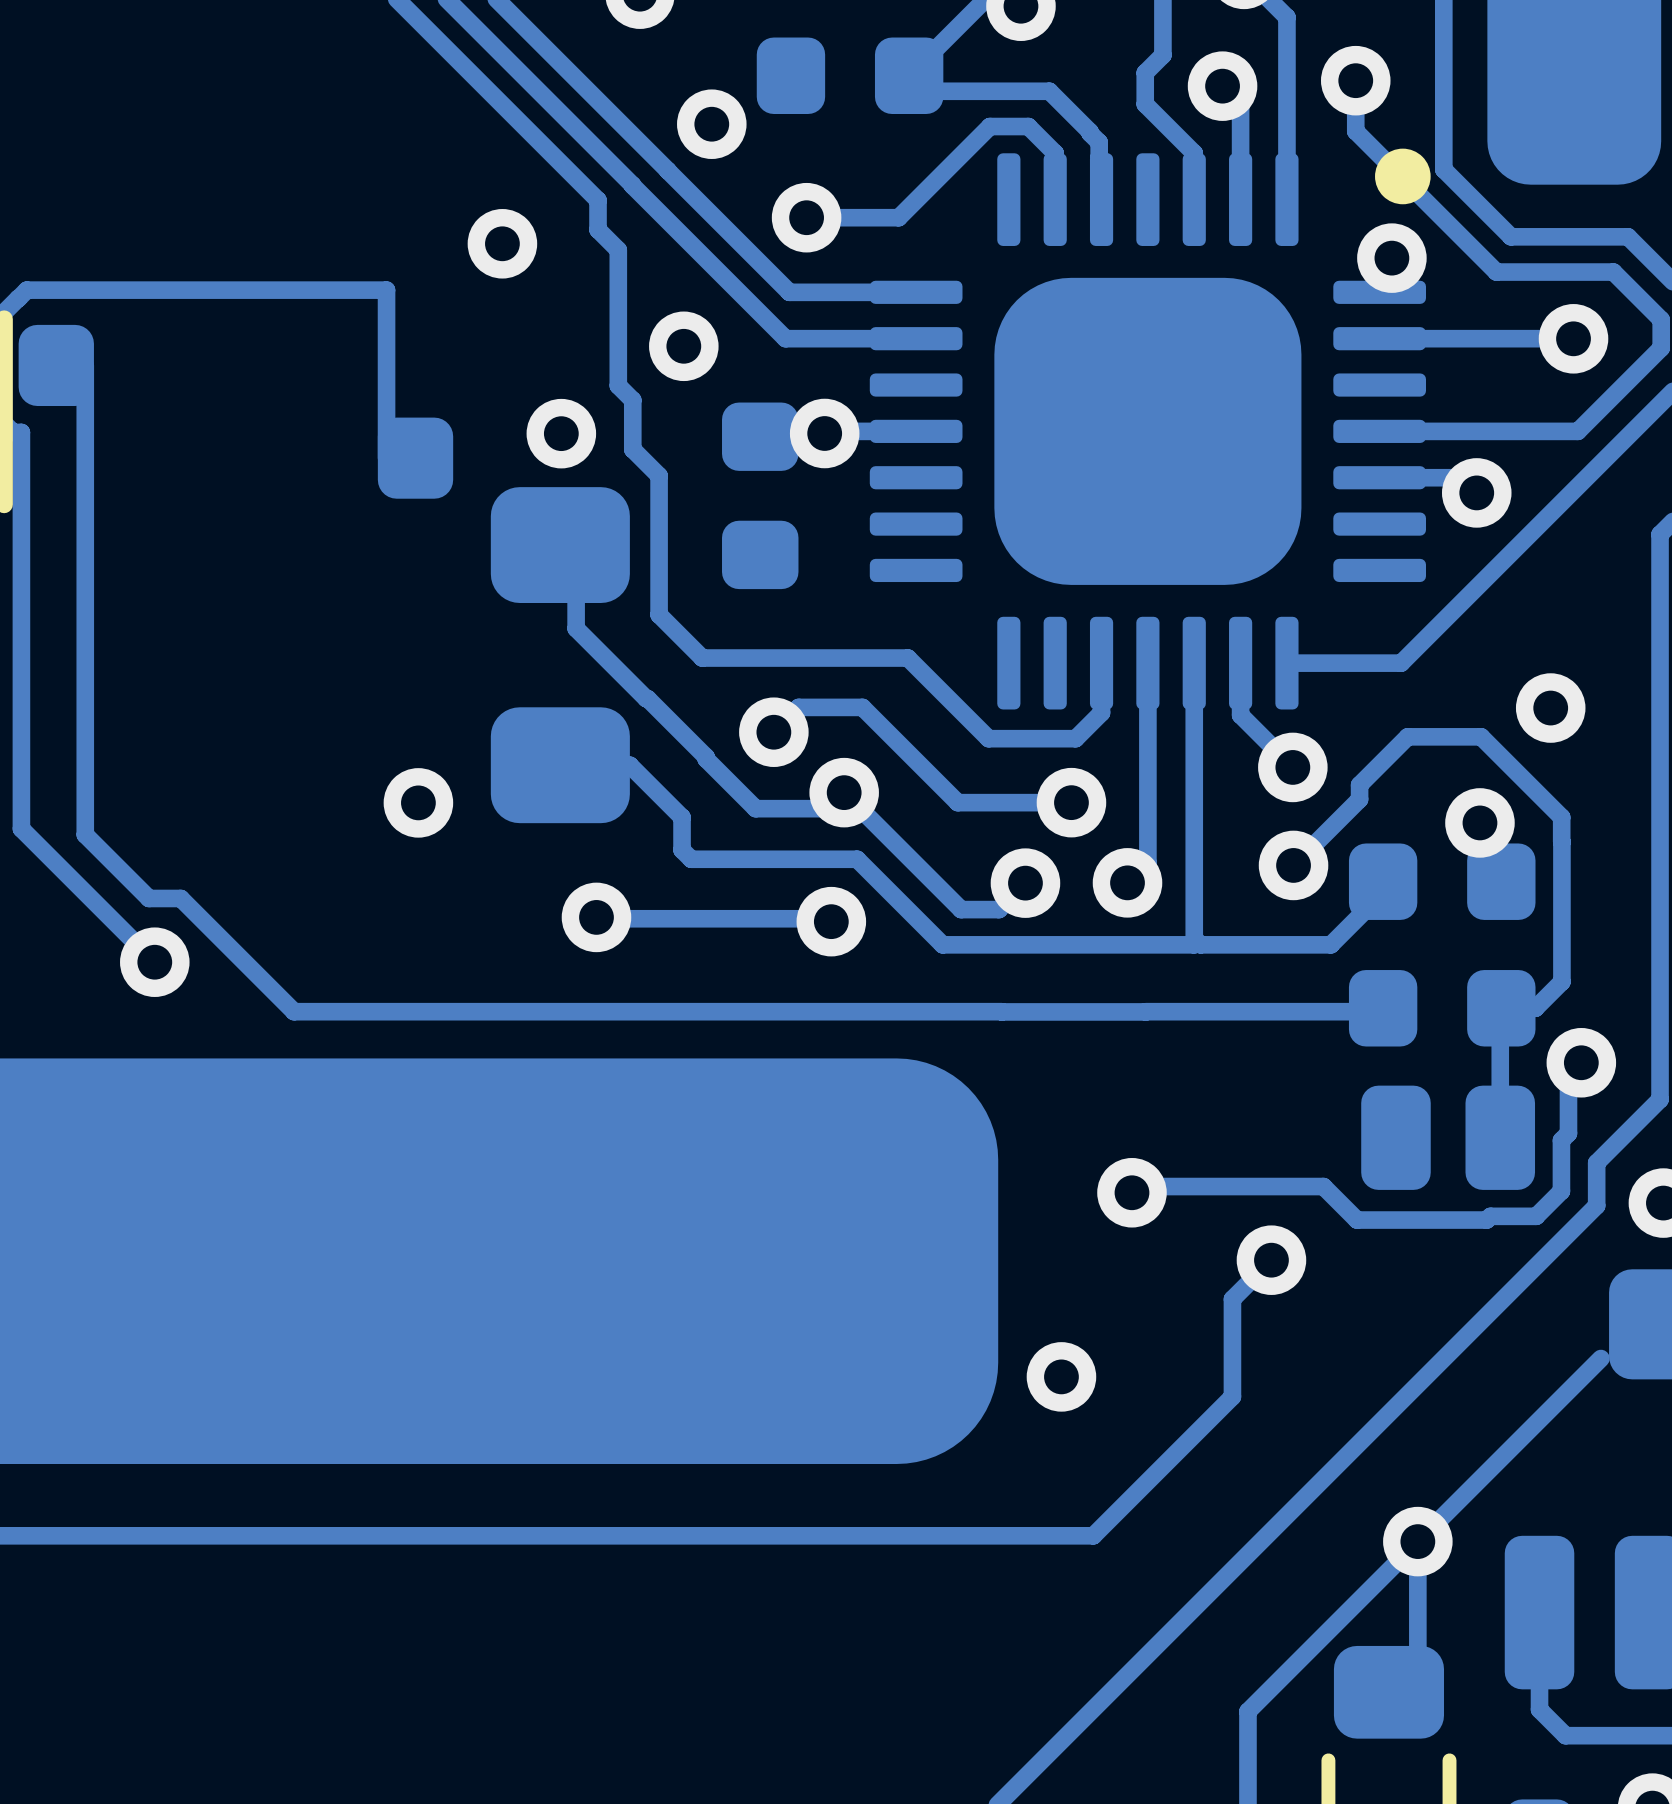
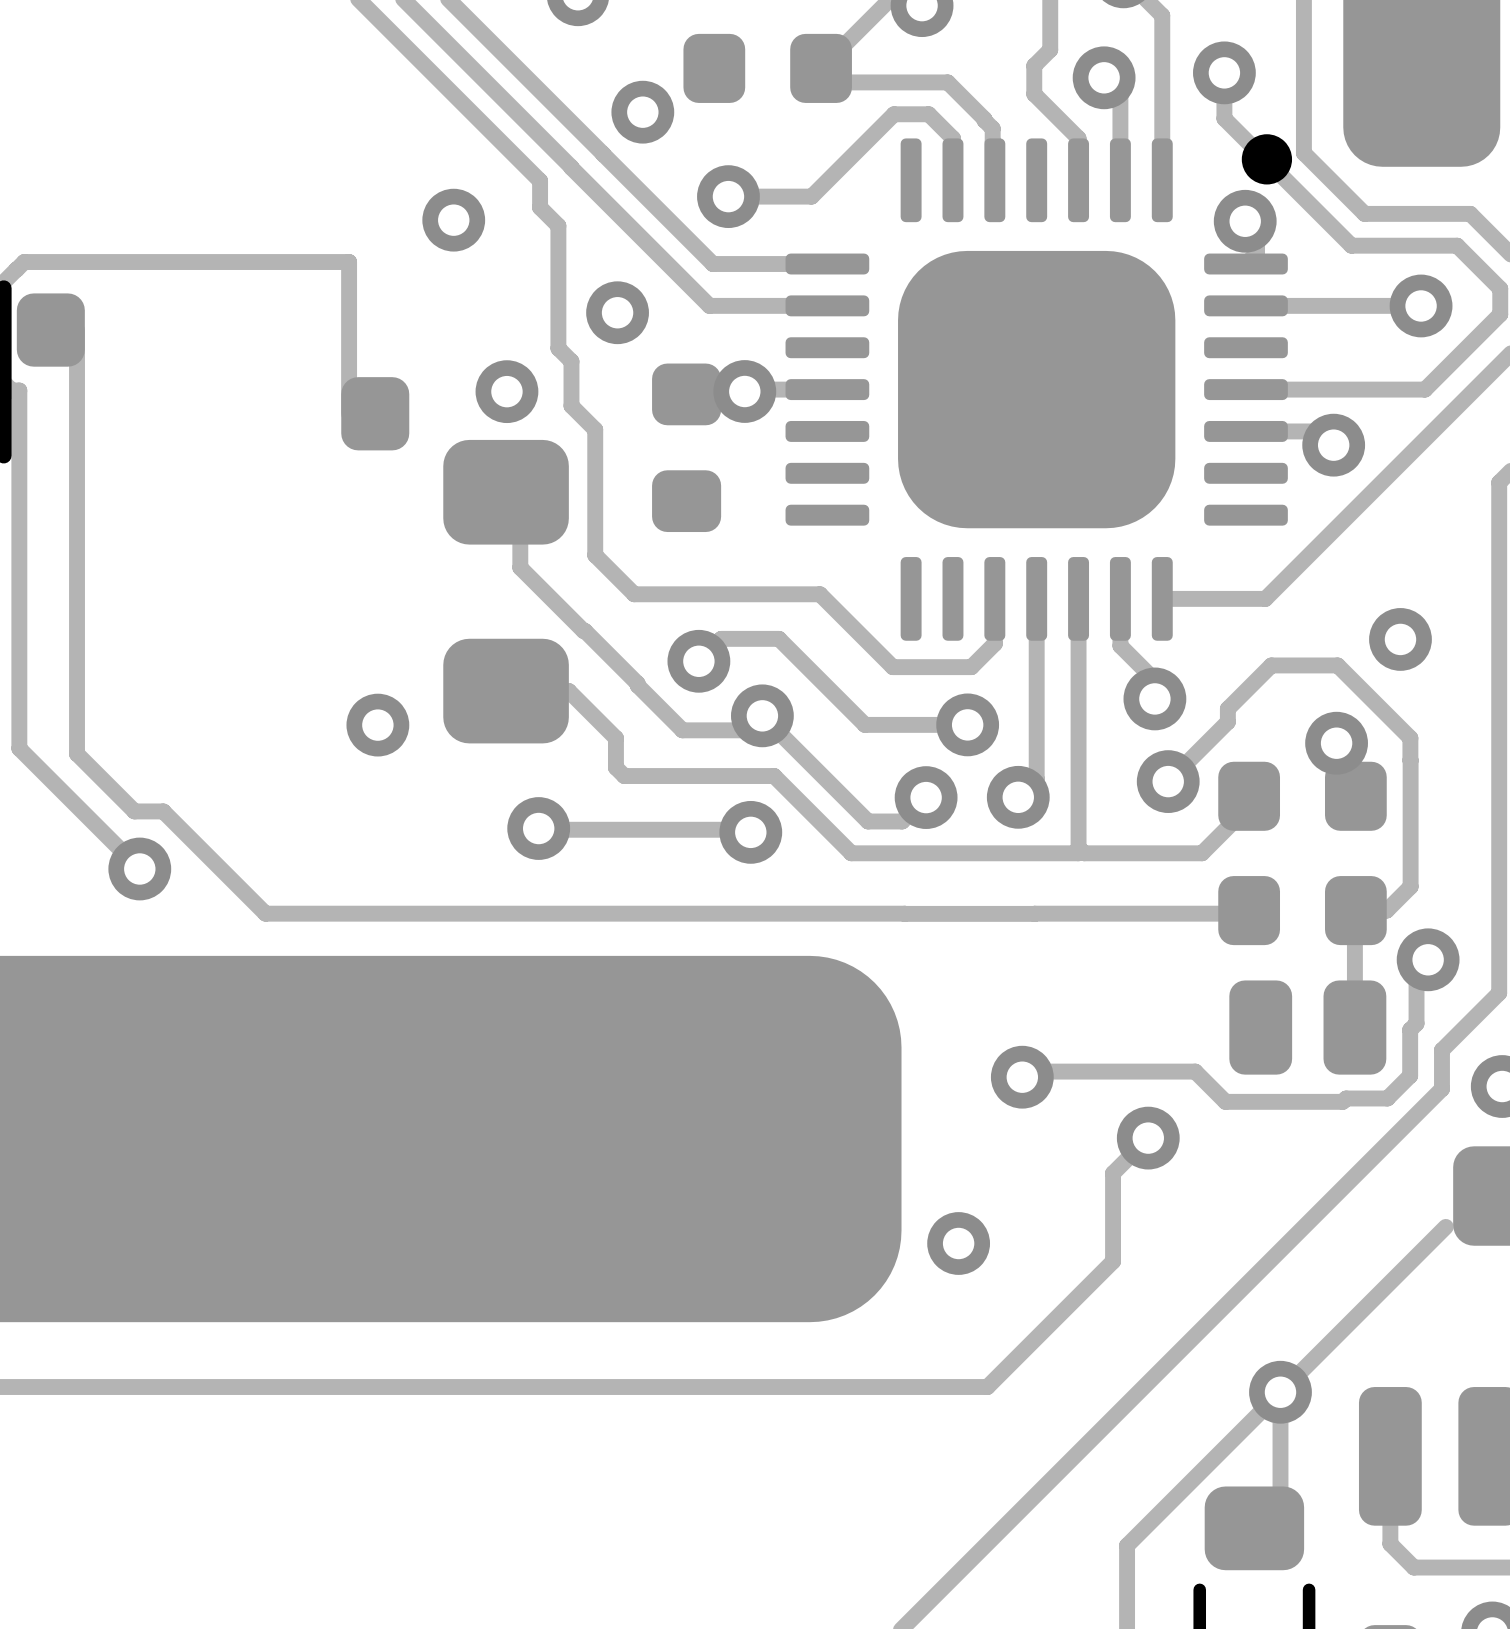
via position: (1391, 258) -> (1245, 221)
via position: (1292, 767) -> (1154, 698)

